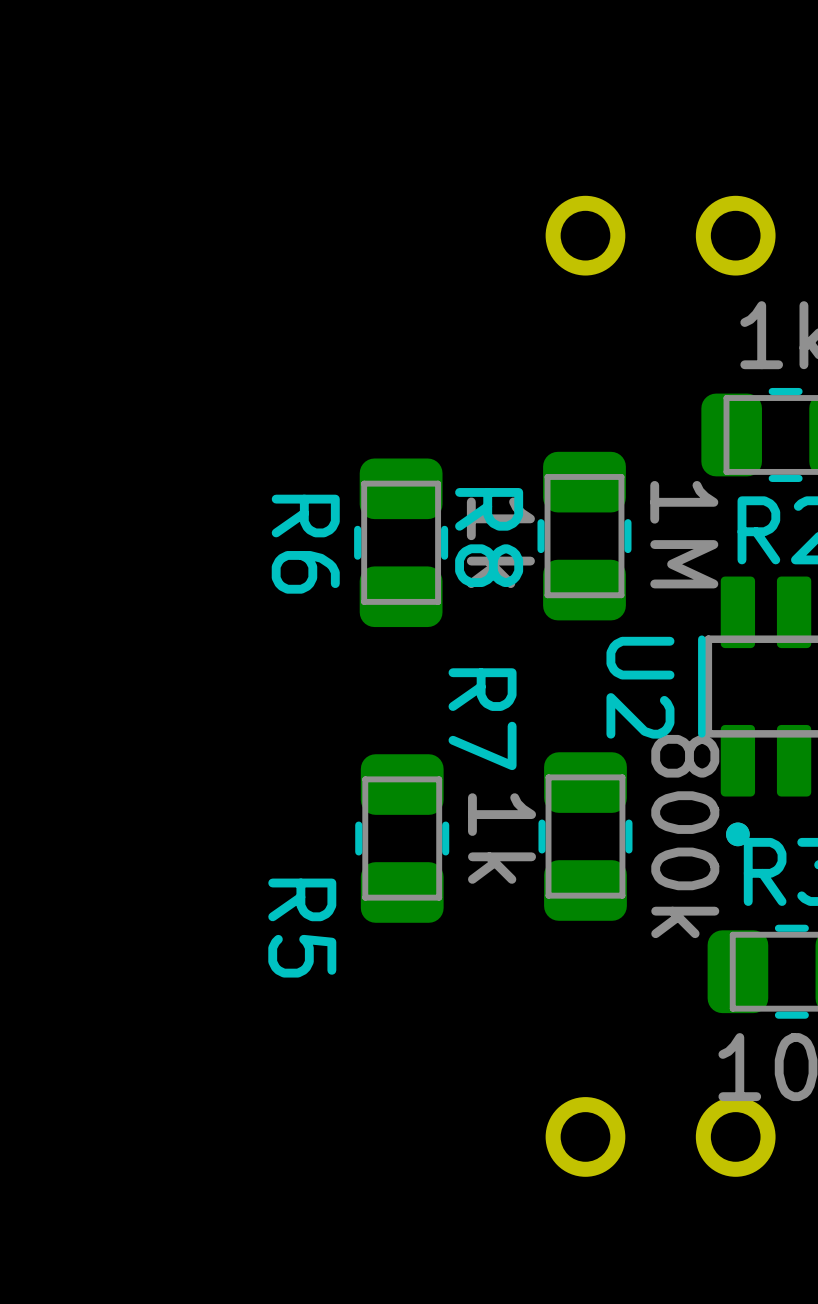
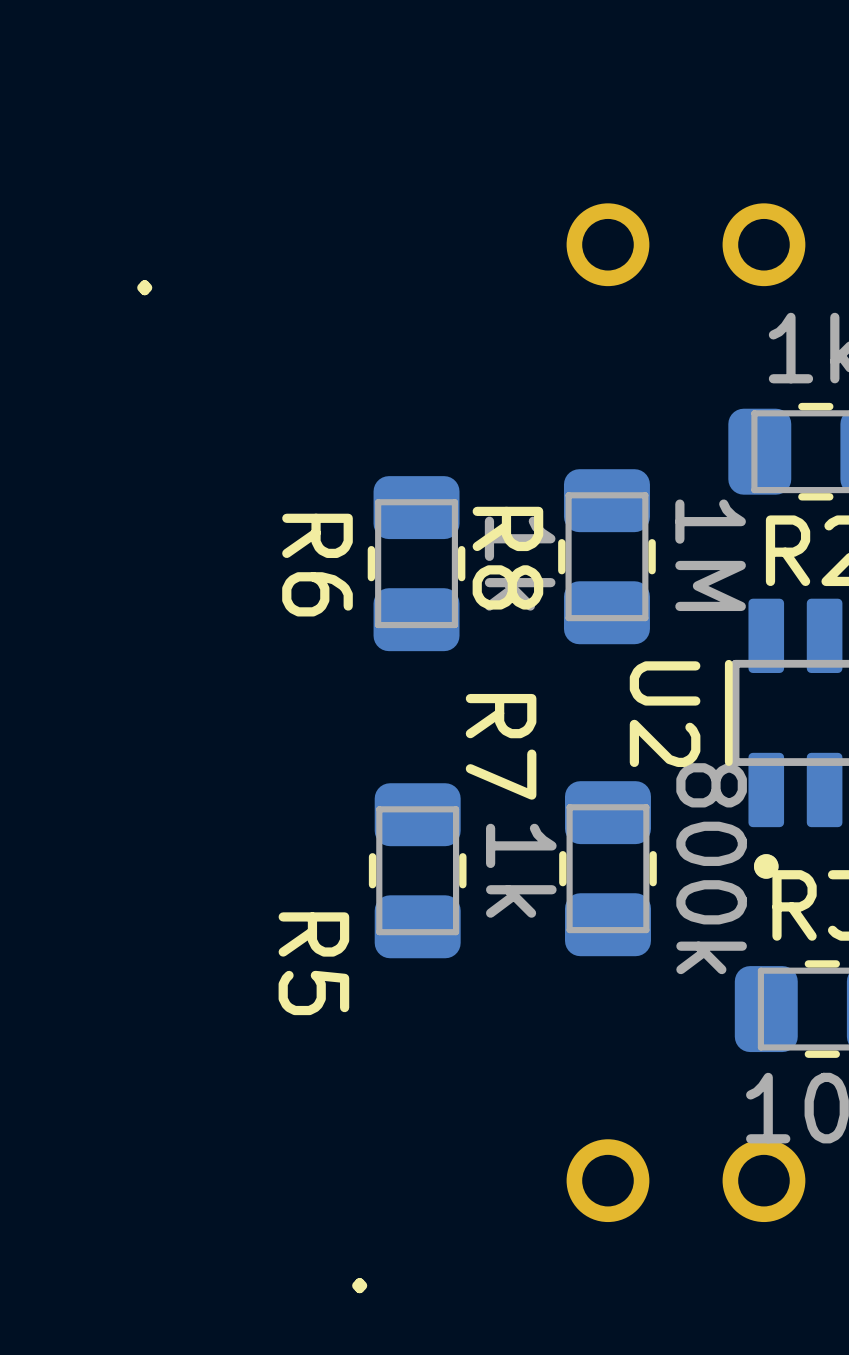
text: none -> . (144, 287)
text: none -> . (359, 1285)

